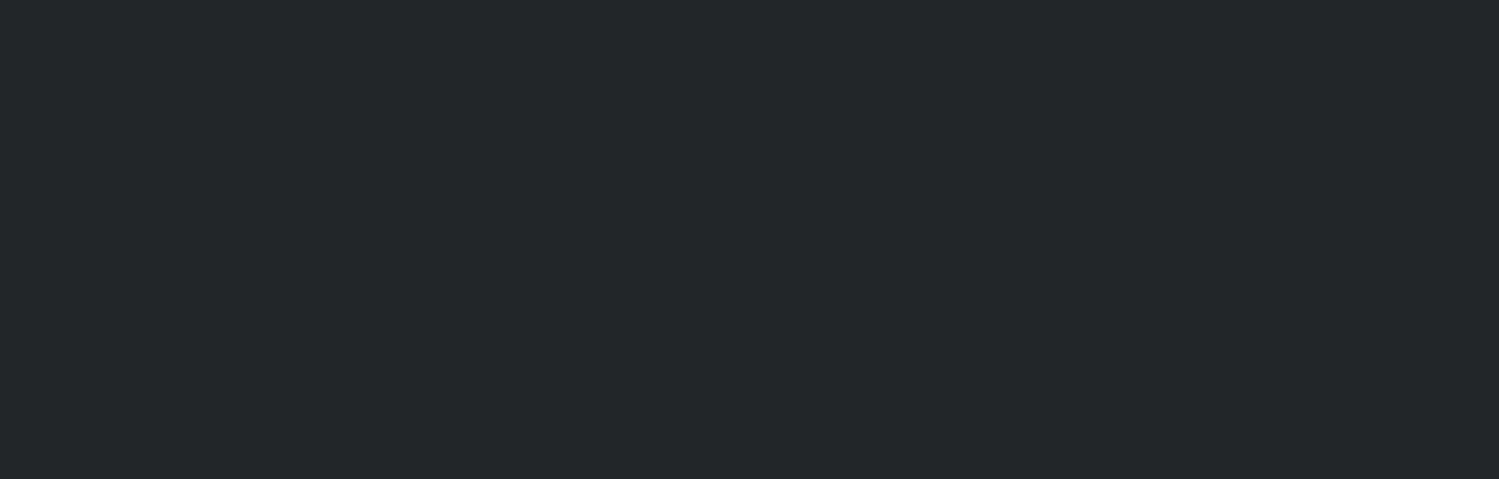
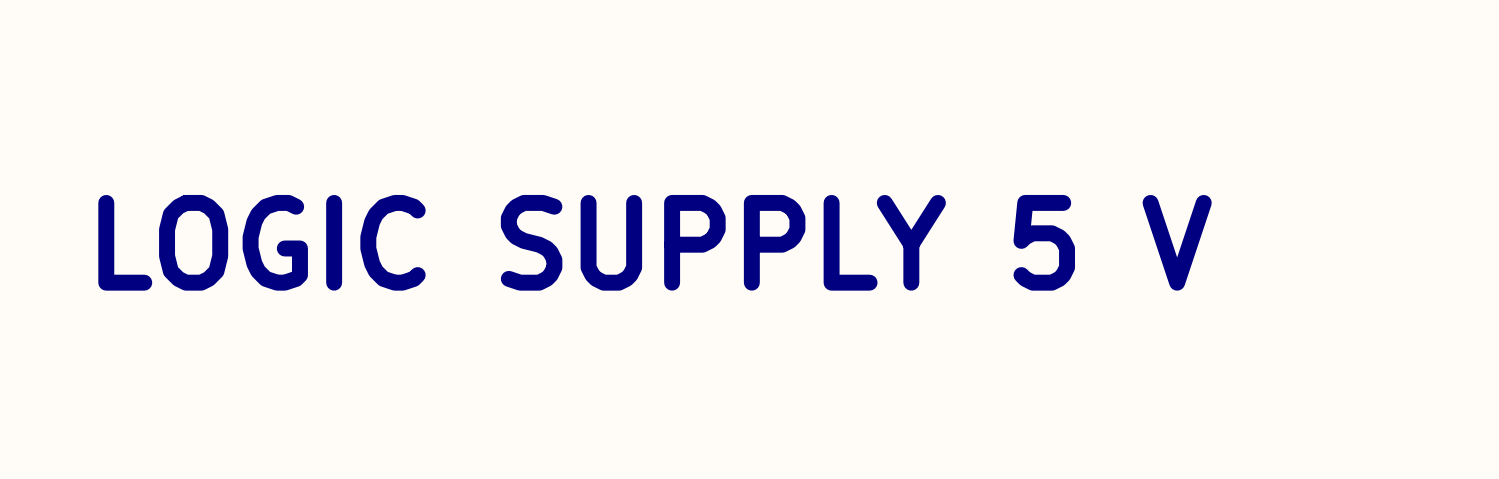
text: none -> LOGIC SUPPLY 5 V (655, 242)

